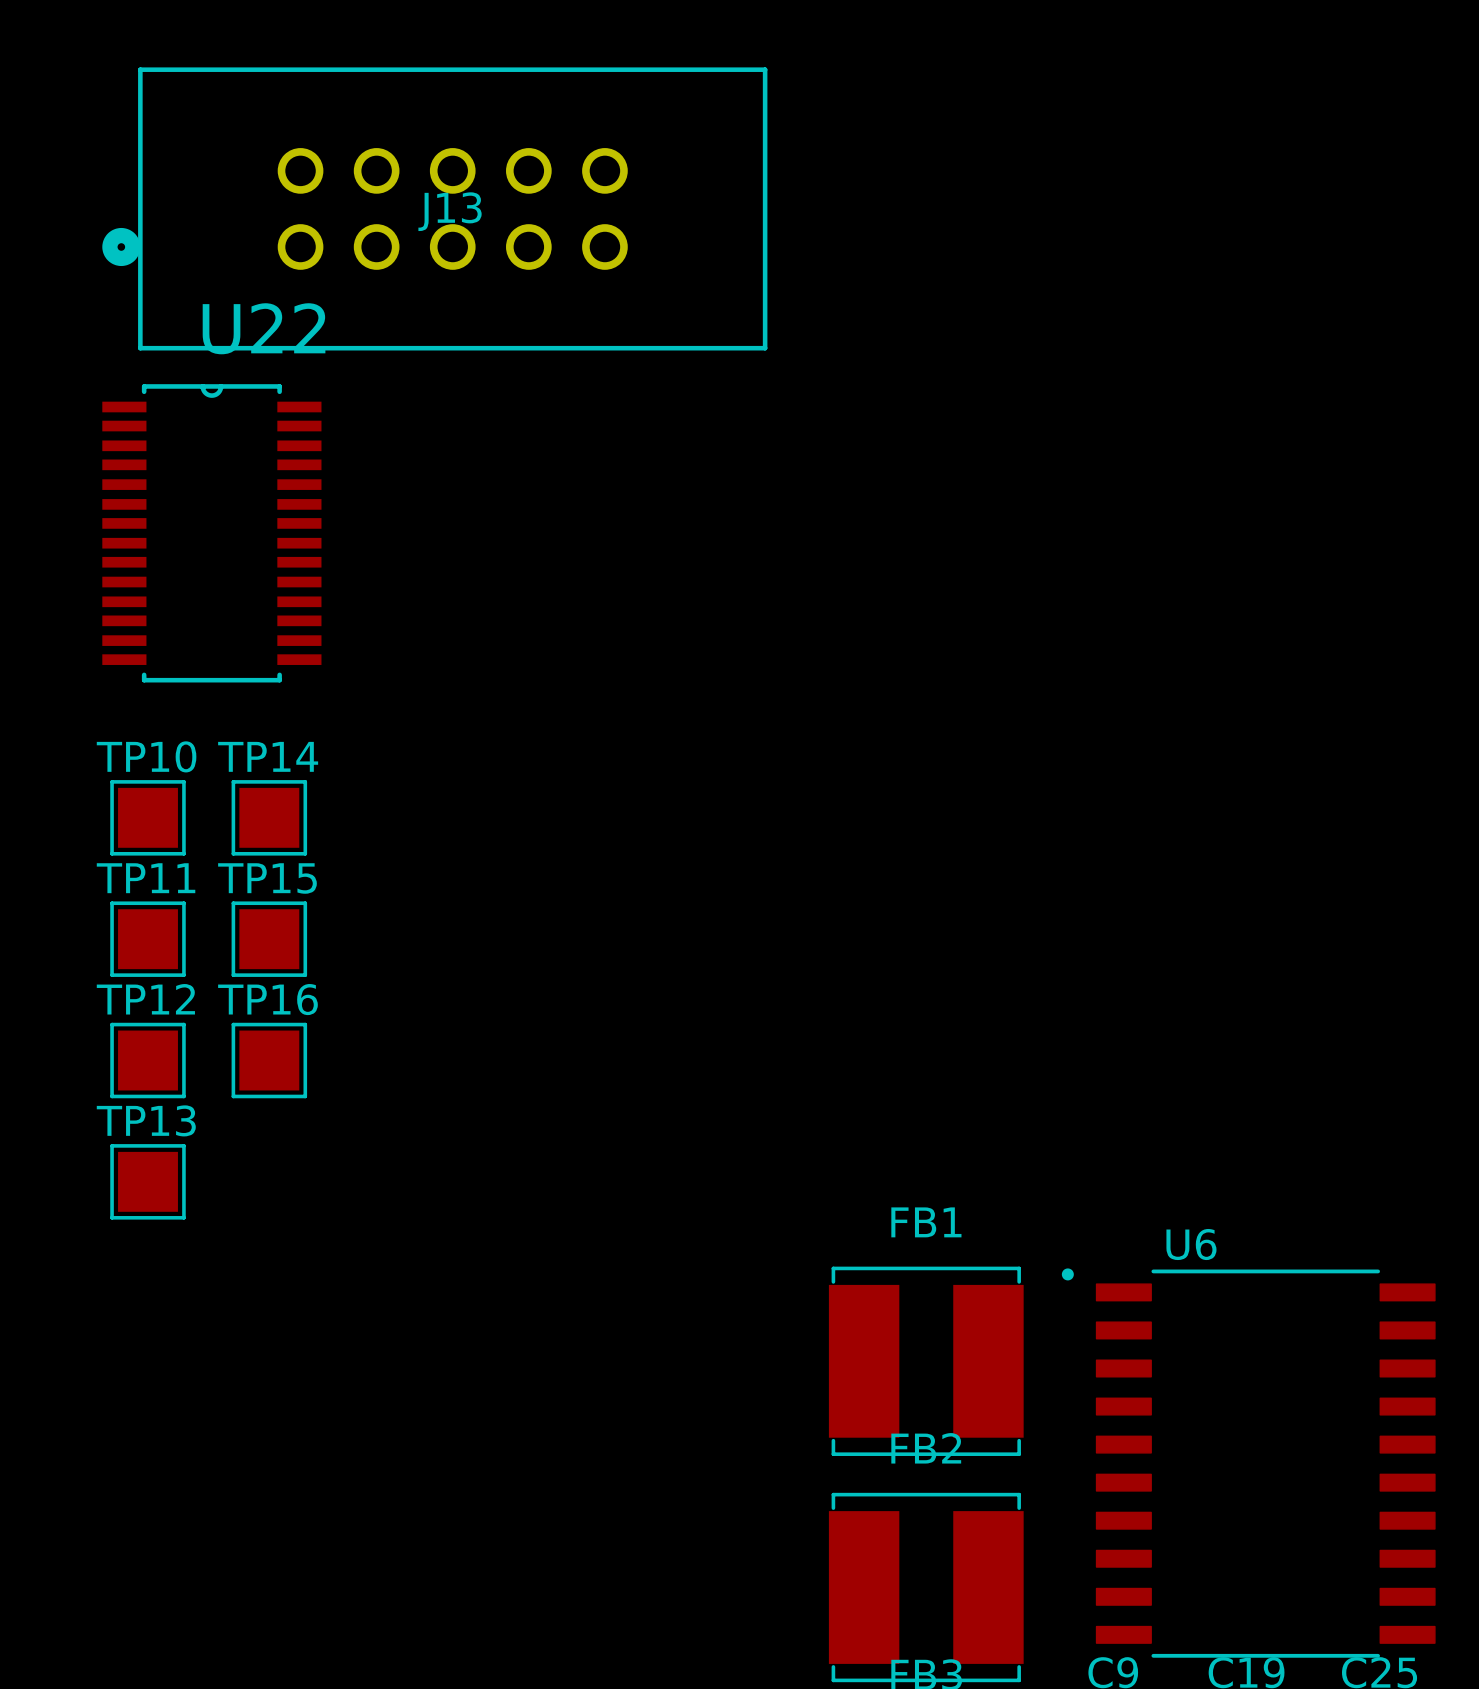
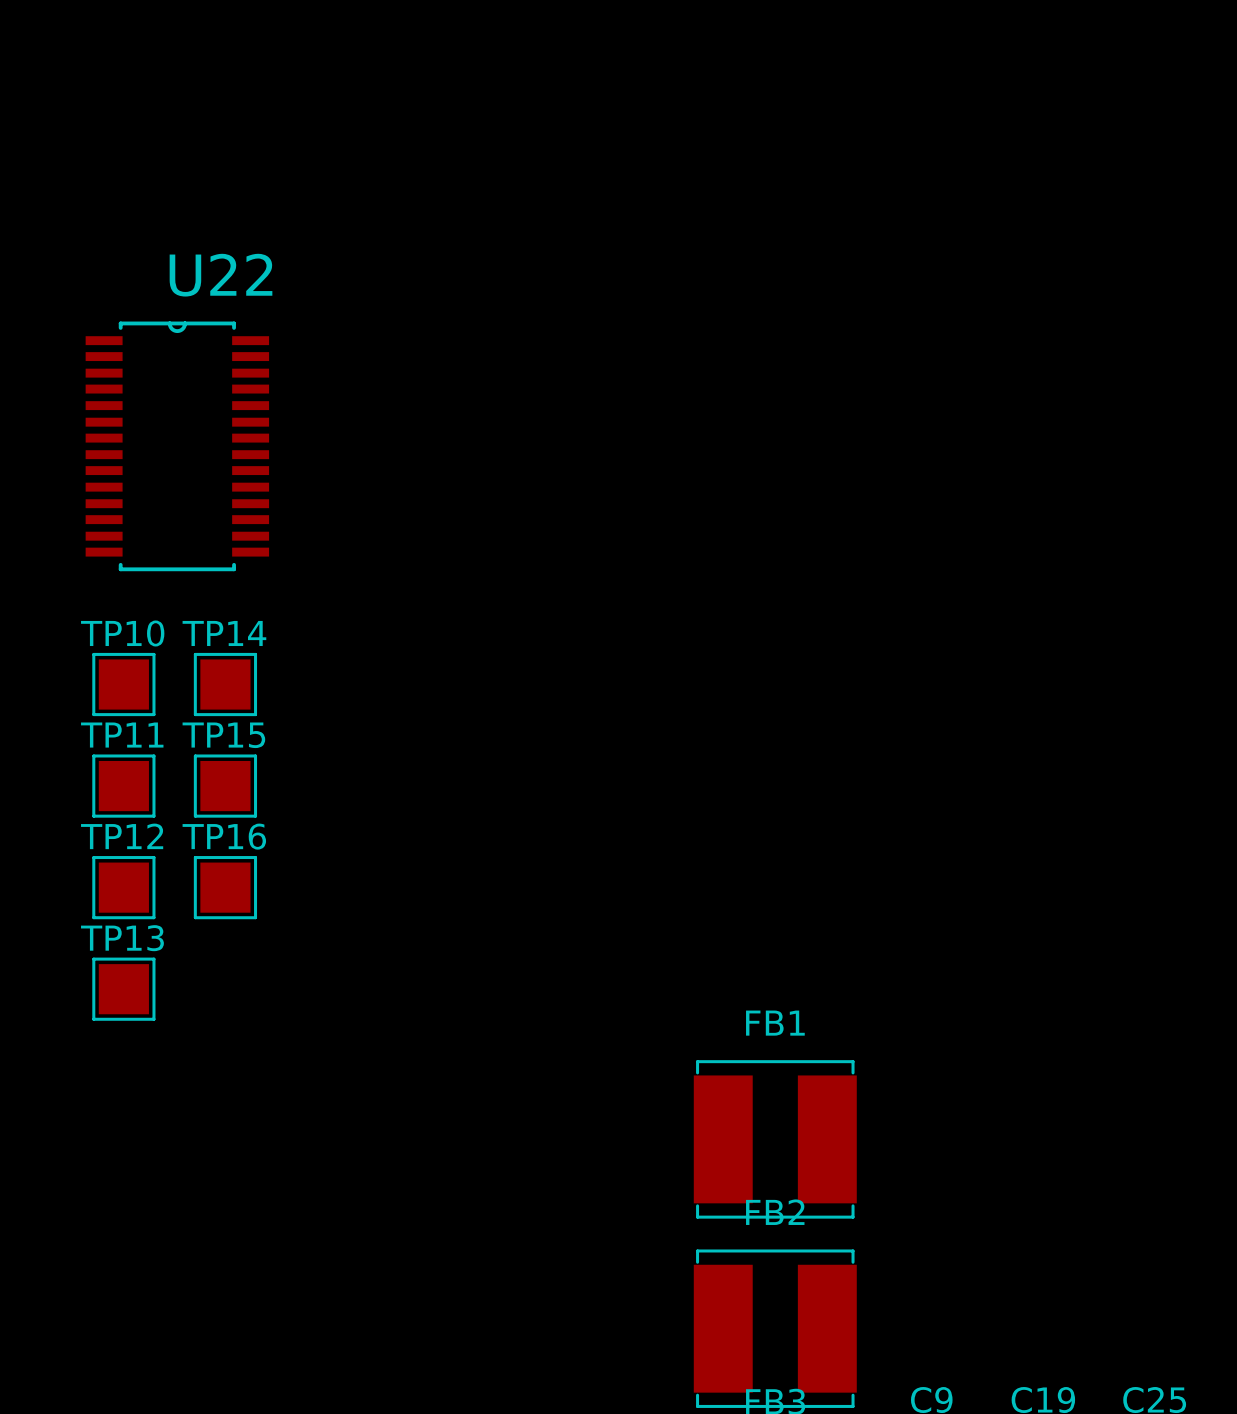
J13: (434, 208) -> none
U6: (1248, 1463) -> none

